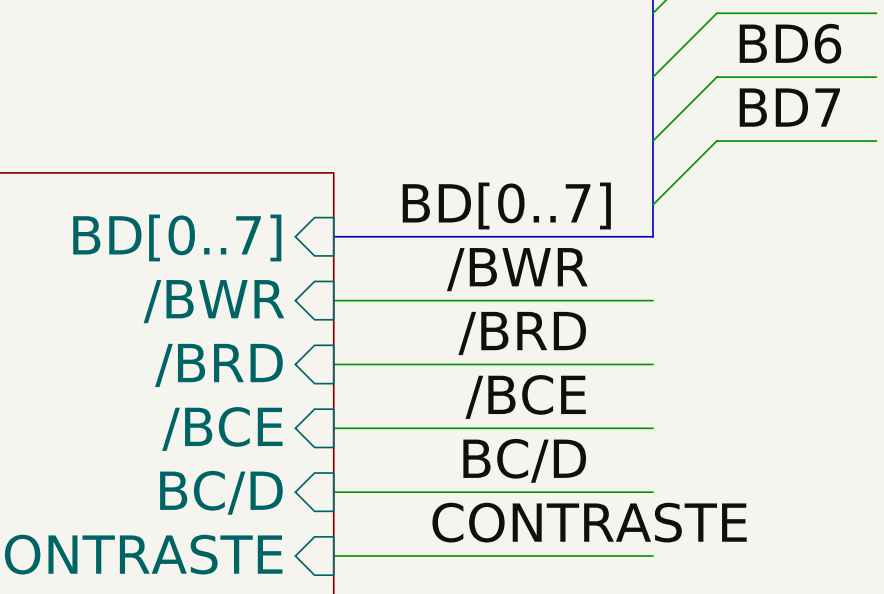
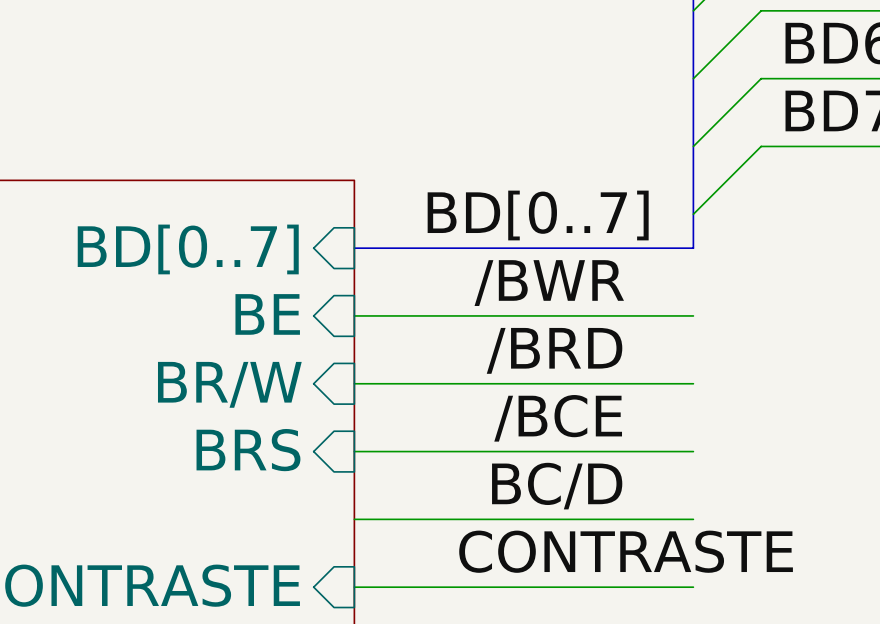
sheet pin: /BWR (213, 301) -> BE (267, 314)
sheet pin: /BRD (218, 365) -> BR/W (229, 384)
sheet pin: /BCE (222, 428) -> BRS (248, 450)
sheet pin: BC/D (221, 492) -> none

